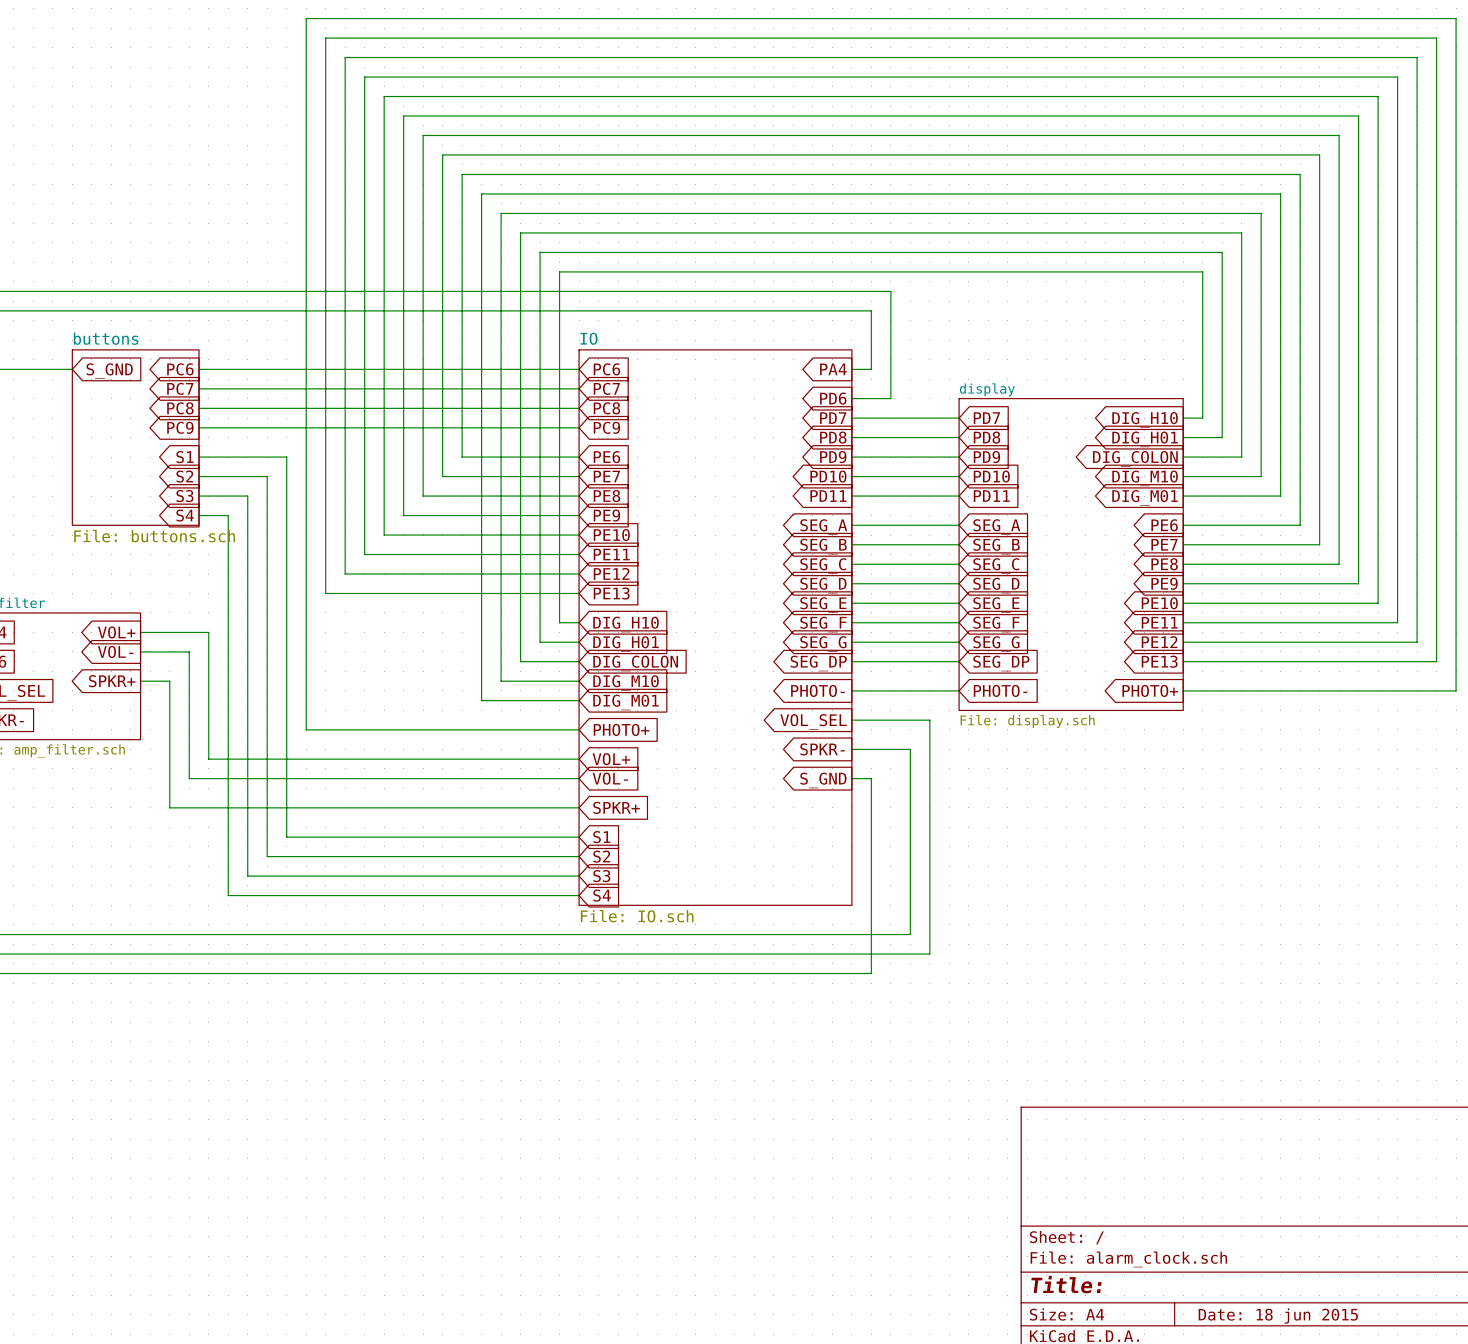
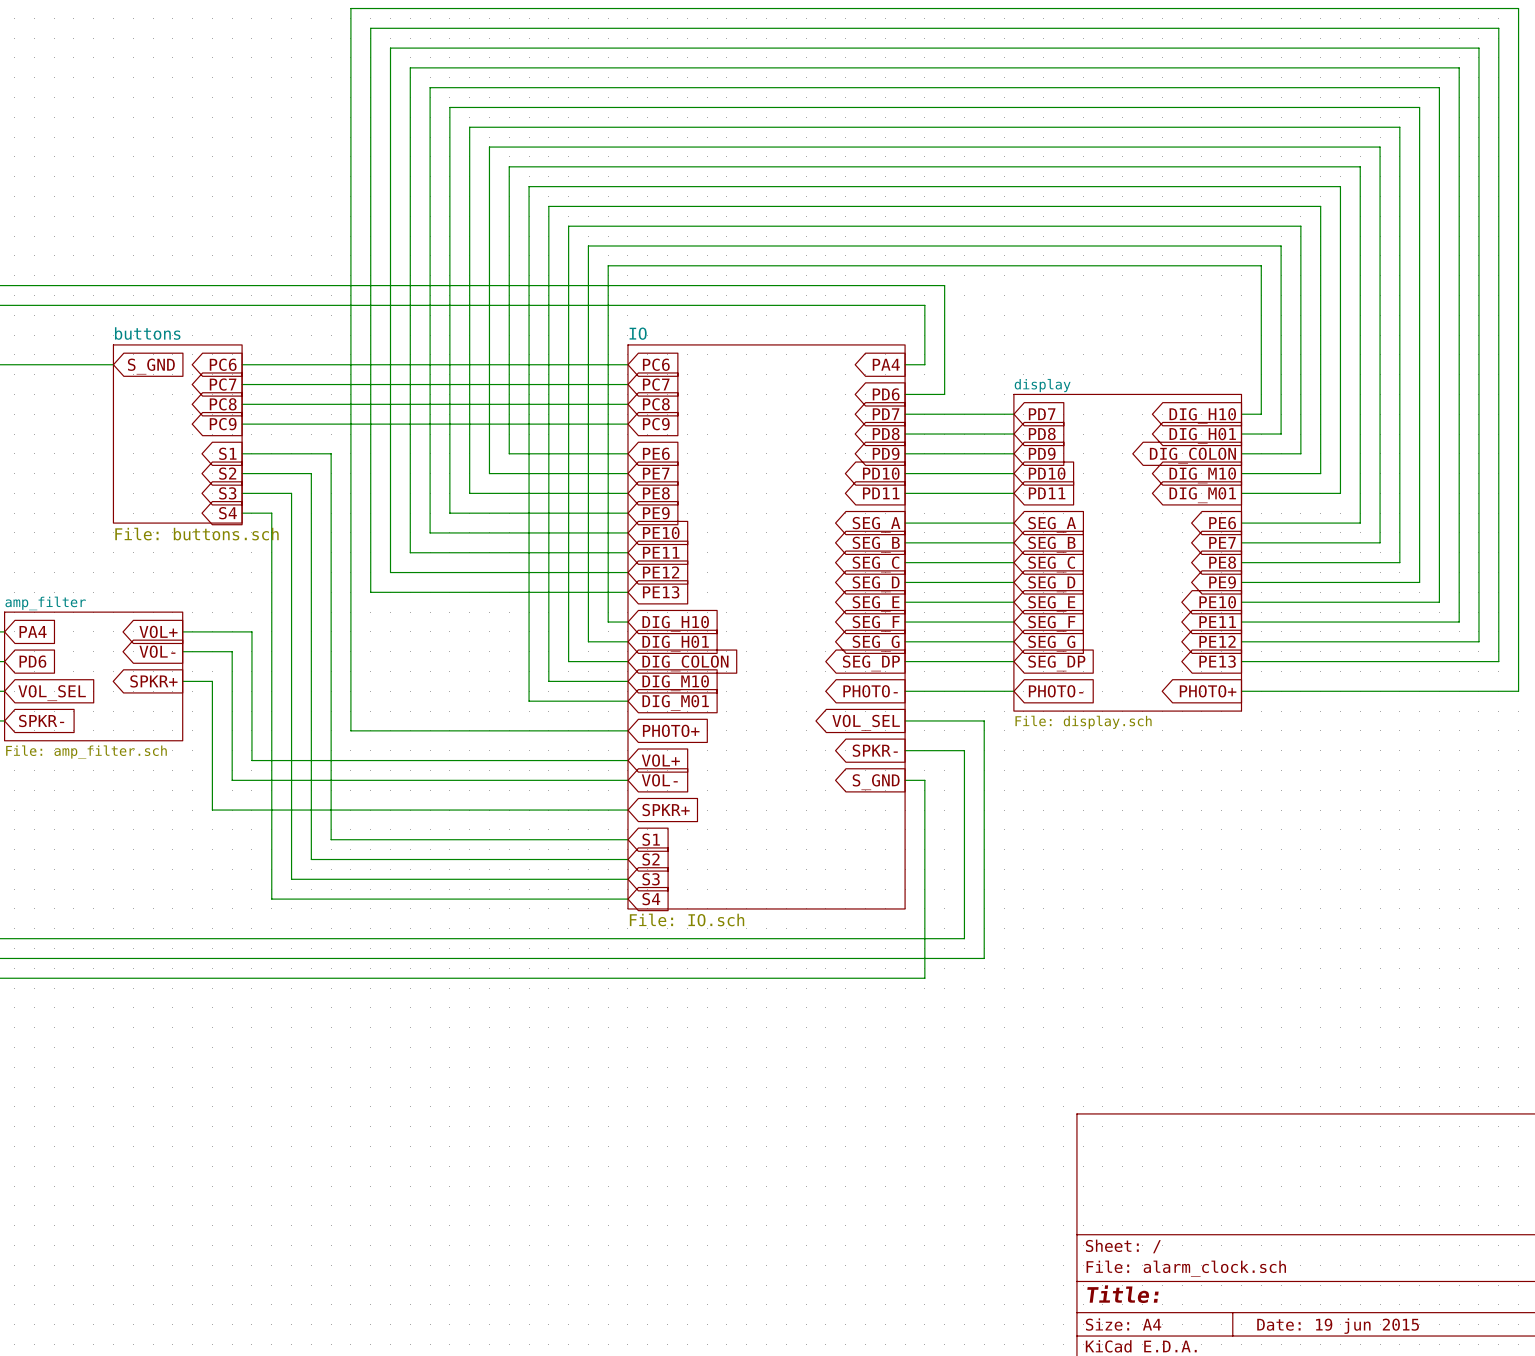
title block: Date: 18 jun 2015 (1278, 1316) -> Date: 19 jun 2015 (1338, 1326)

